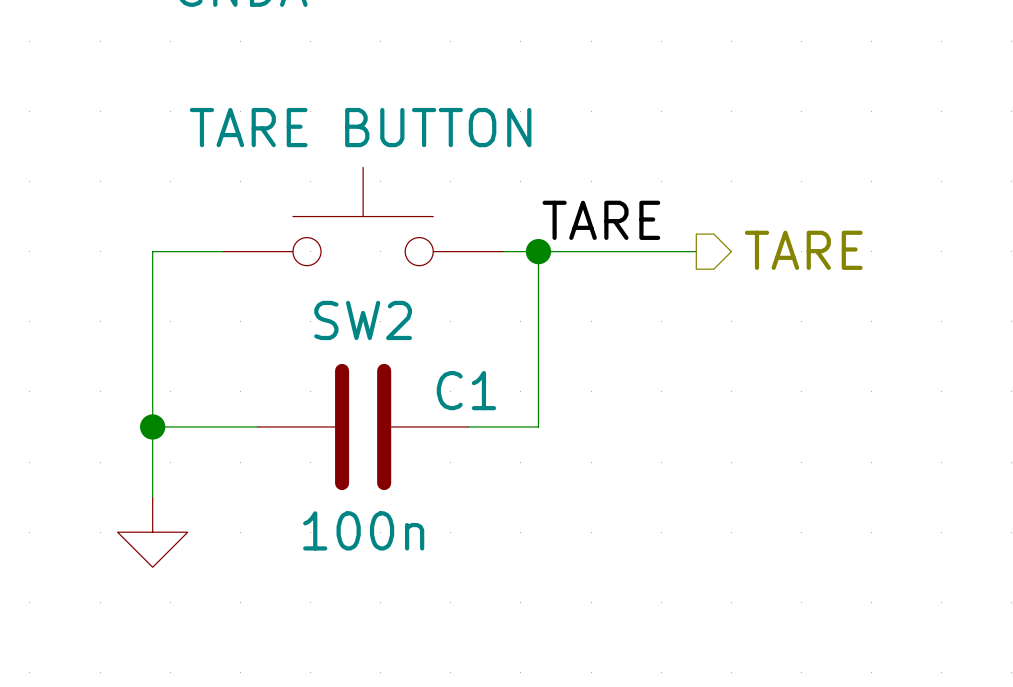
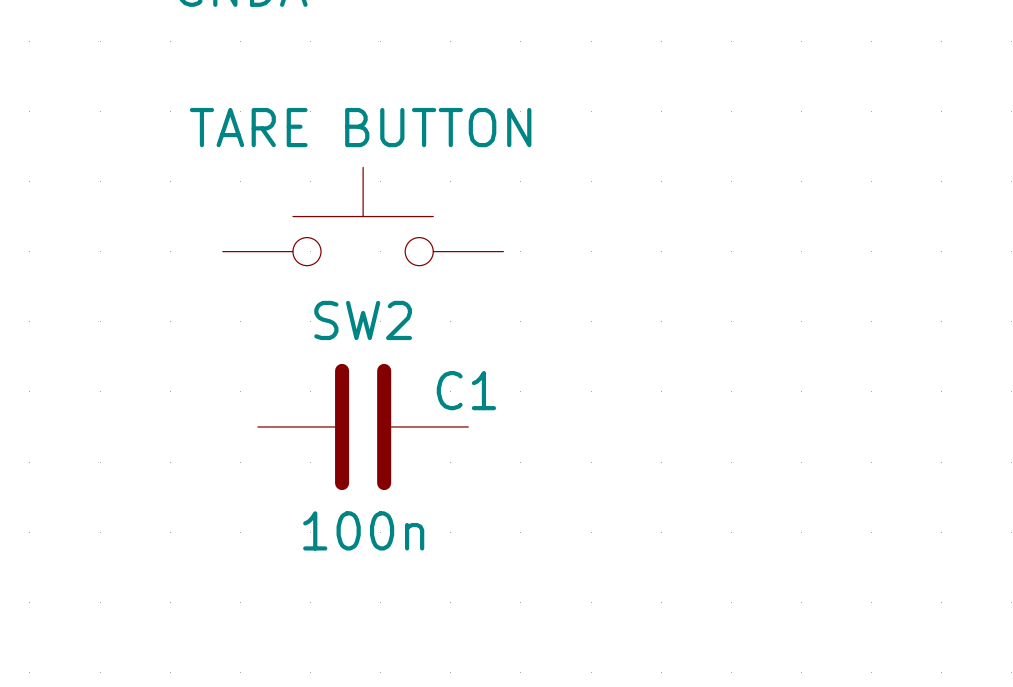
label: TARE (601, 220) -> none
hierarchical label: TARE (803, 250) -> none
wire: (222, 251) (152, 251) (152, 497) -> none
wire: (503, 251) (696, 251) -> none
wire: (538, 251) (538, 426) (468, 426) -> none
junction: (538, 251) -> none
wire: (152, 426) (257, 426) -> none
junction: (152, 426) -> none
power symbol: (152, 532) -> none

